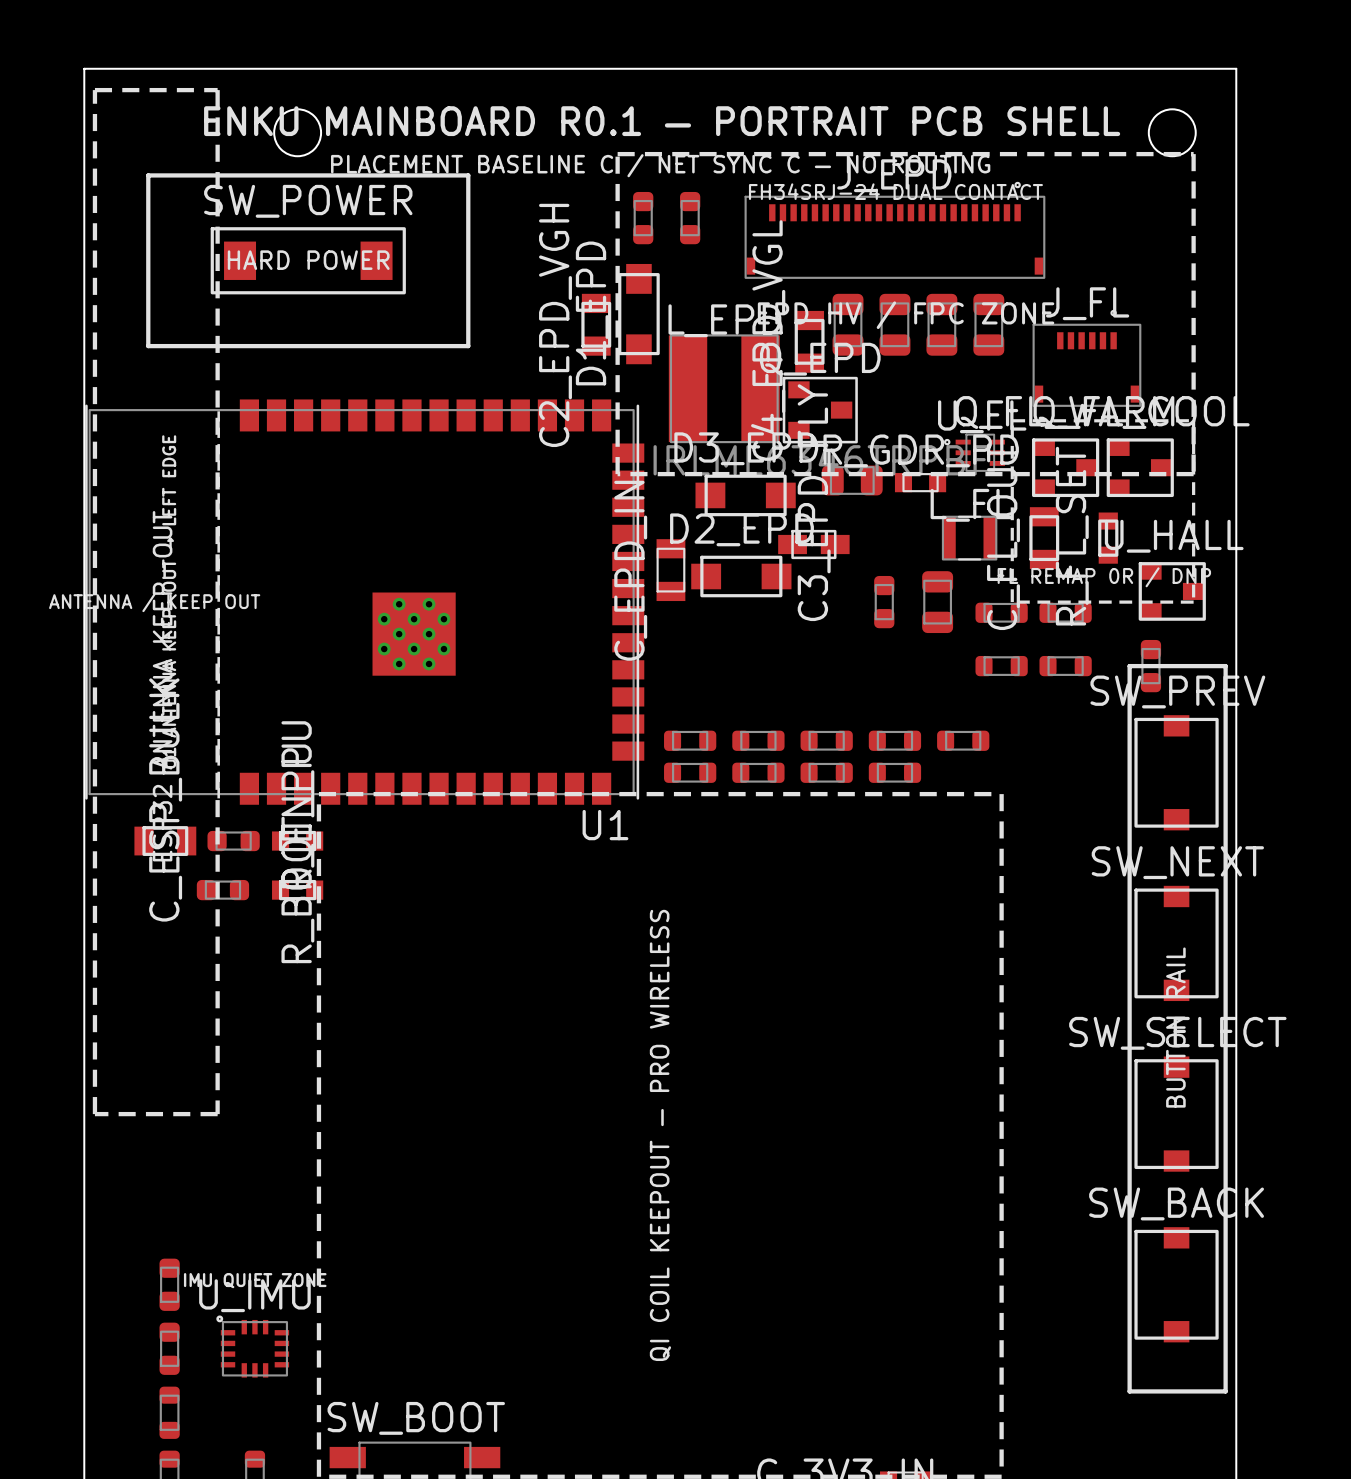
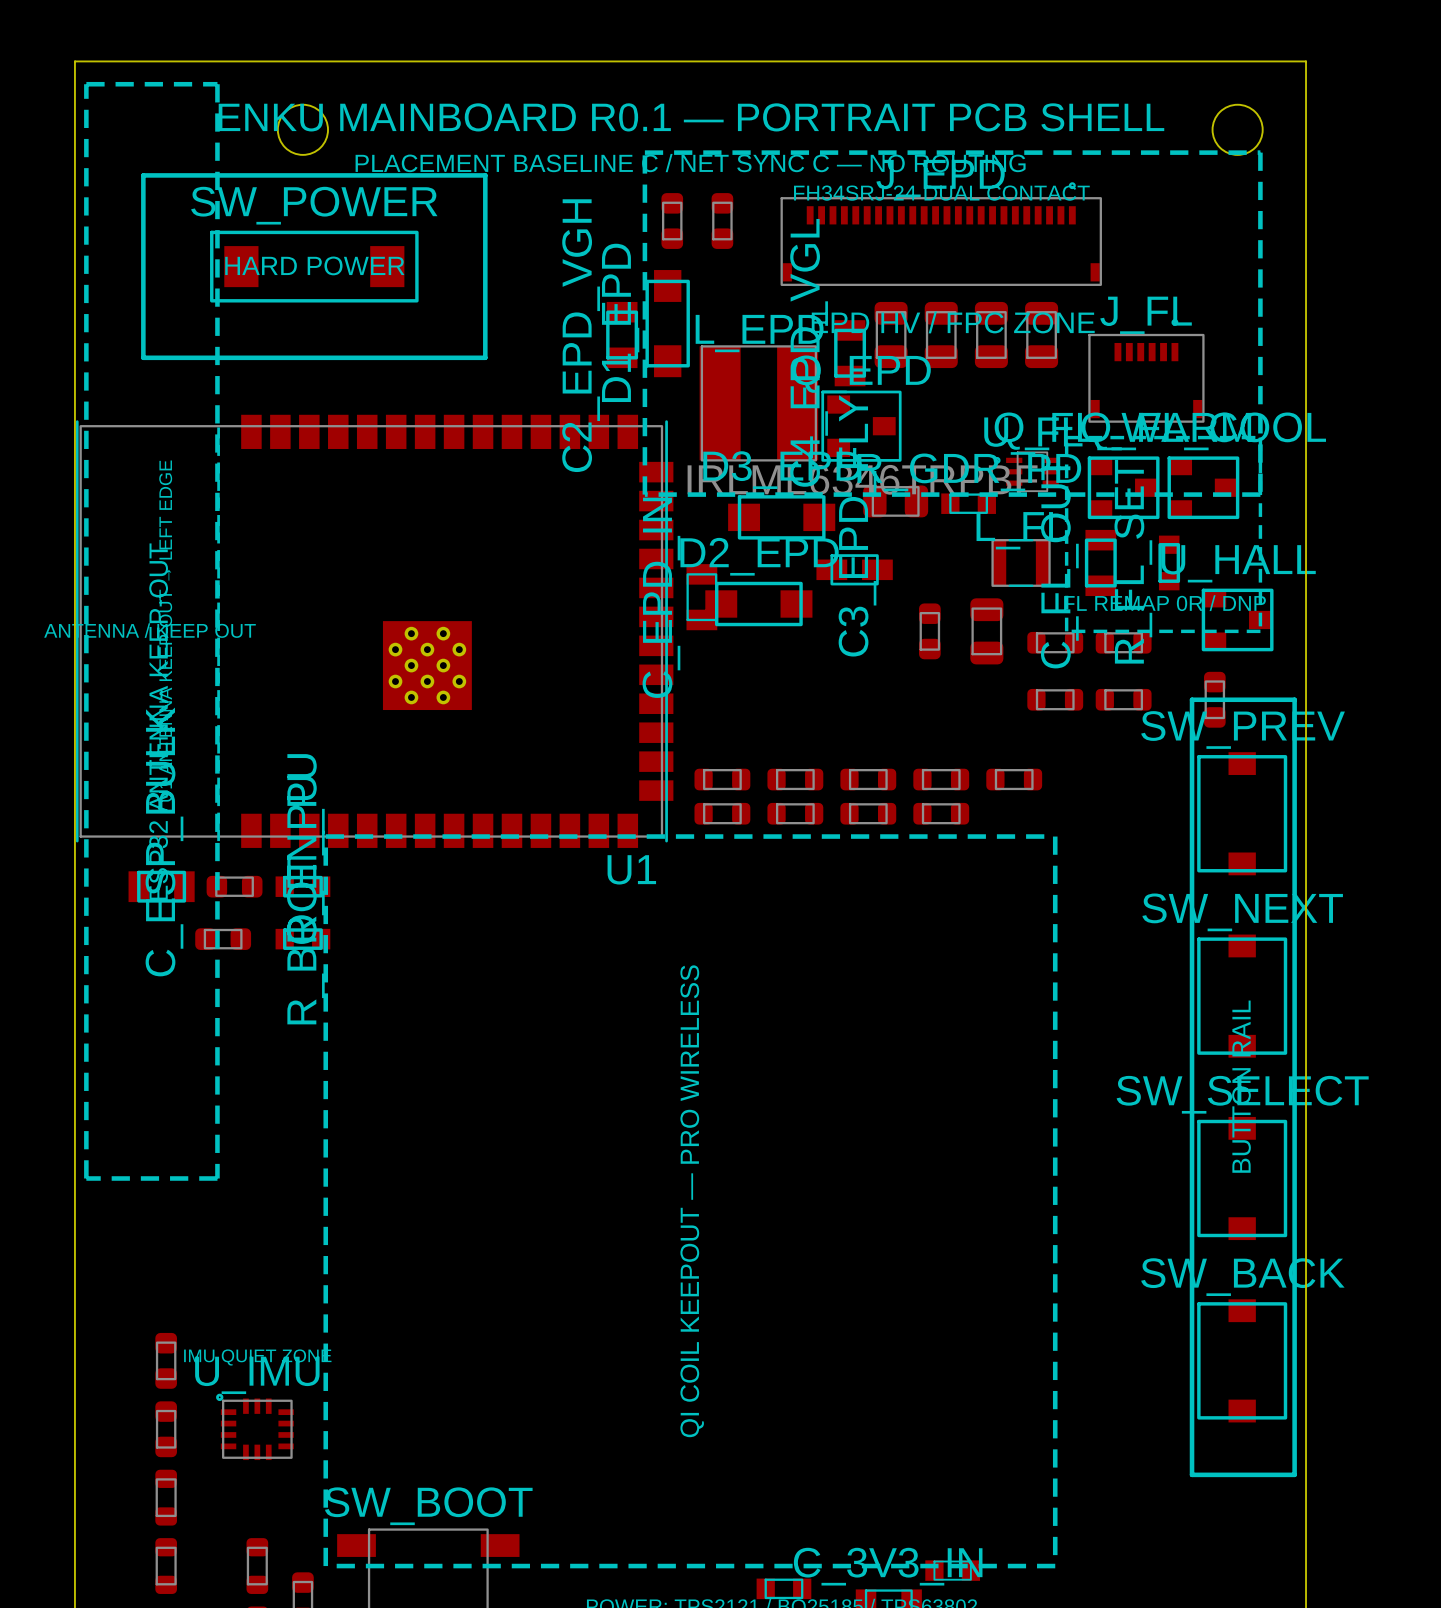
D2_EPD position: (741, 576) -> (758, 604)

